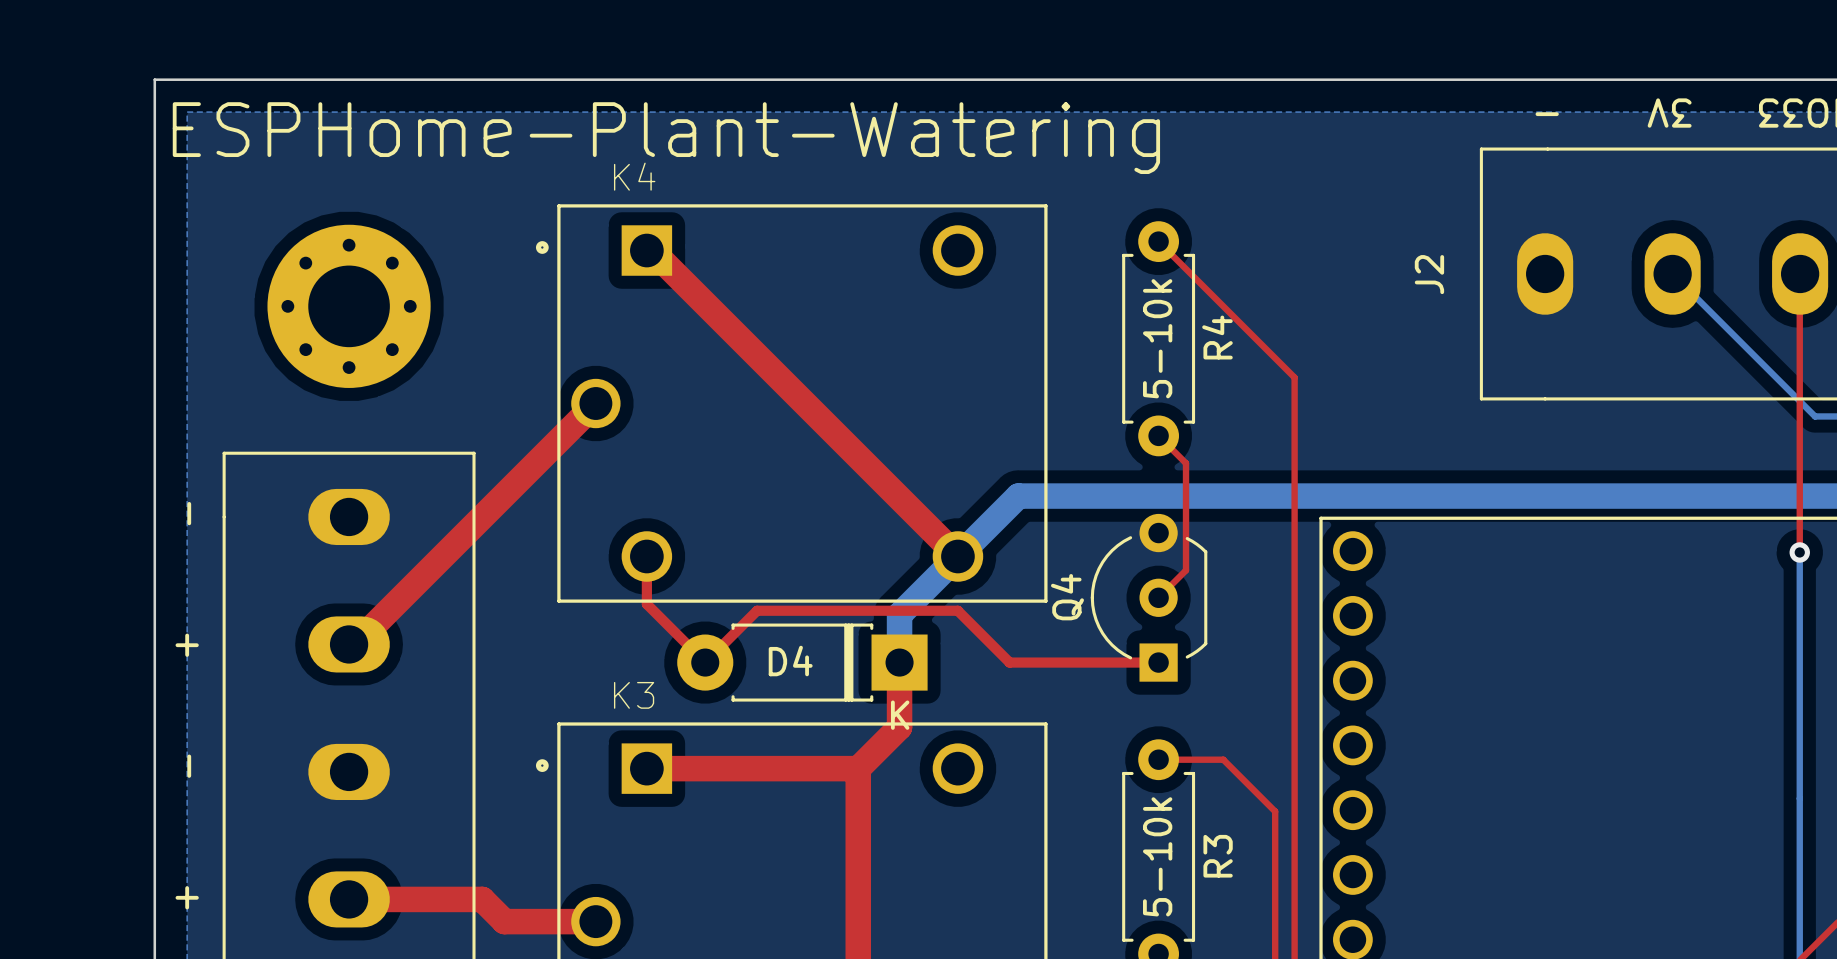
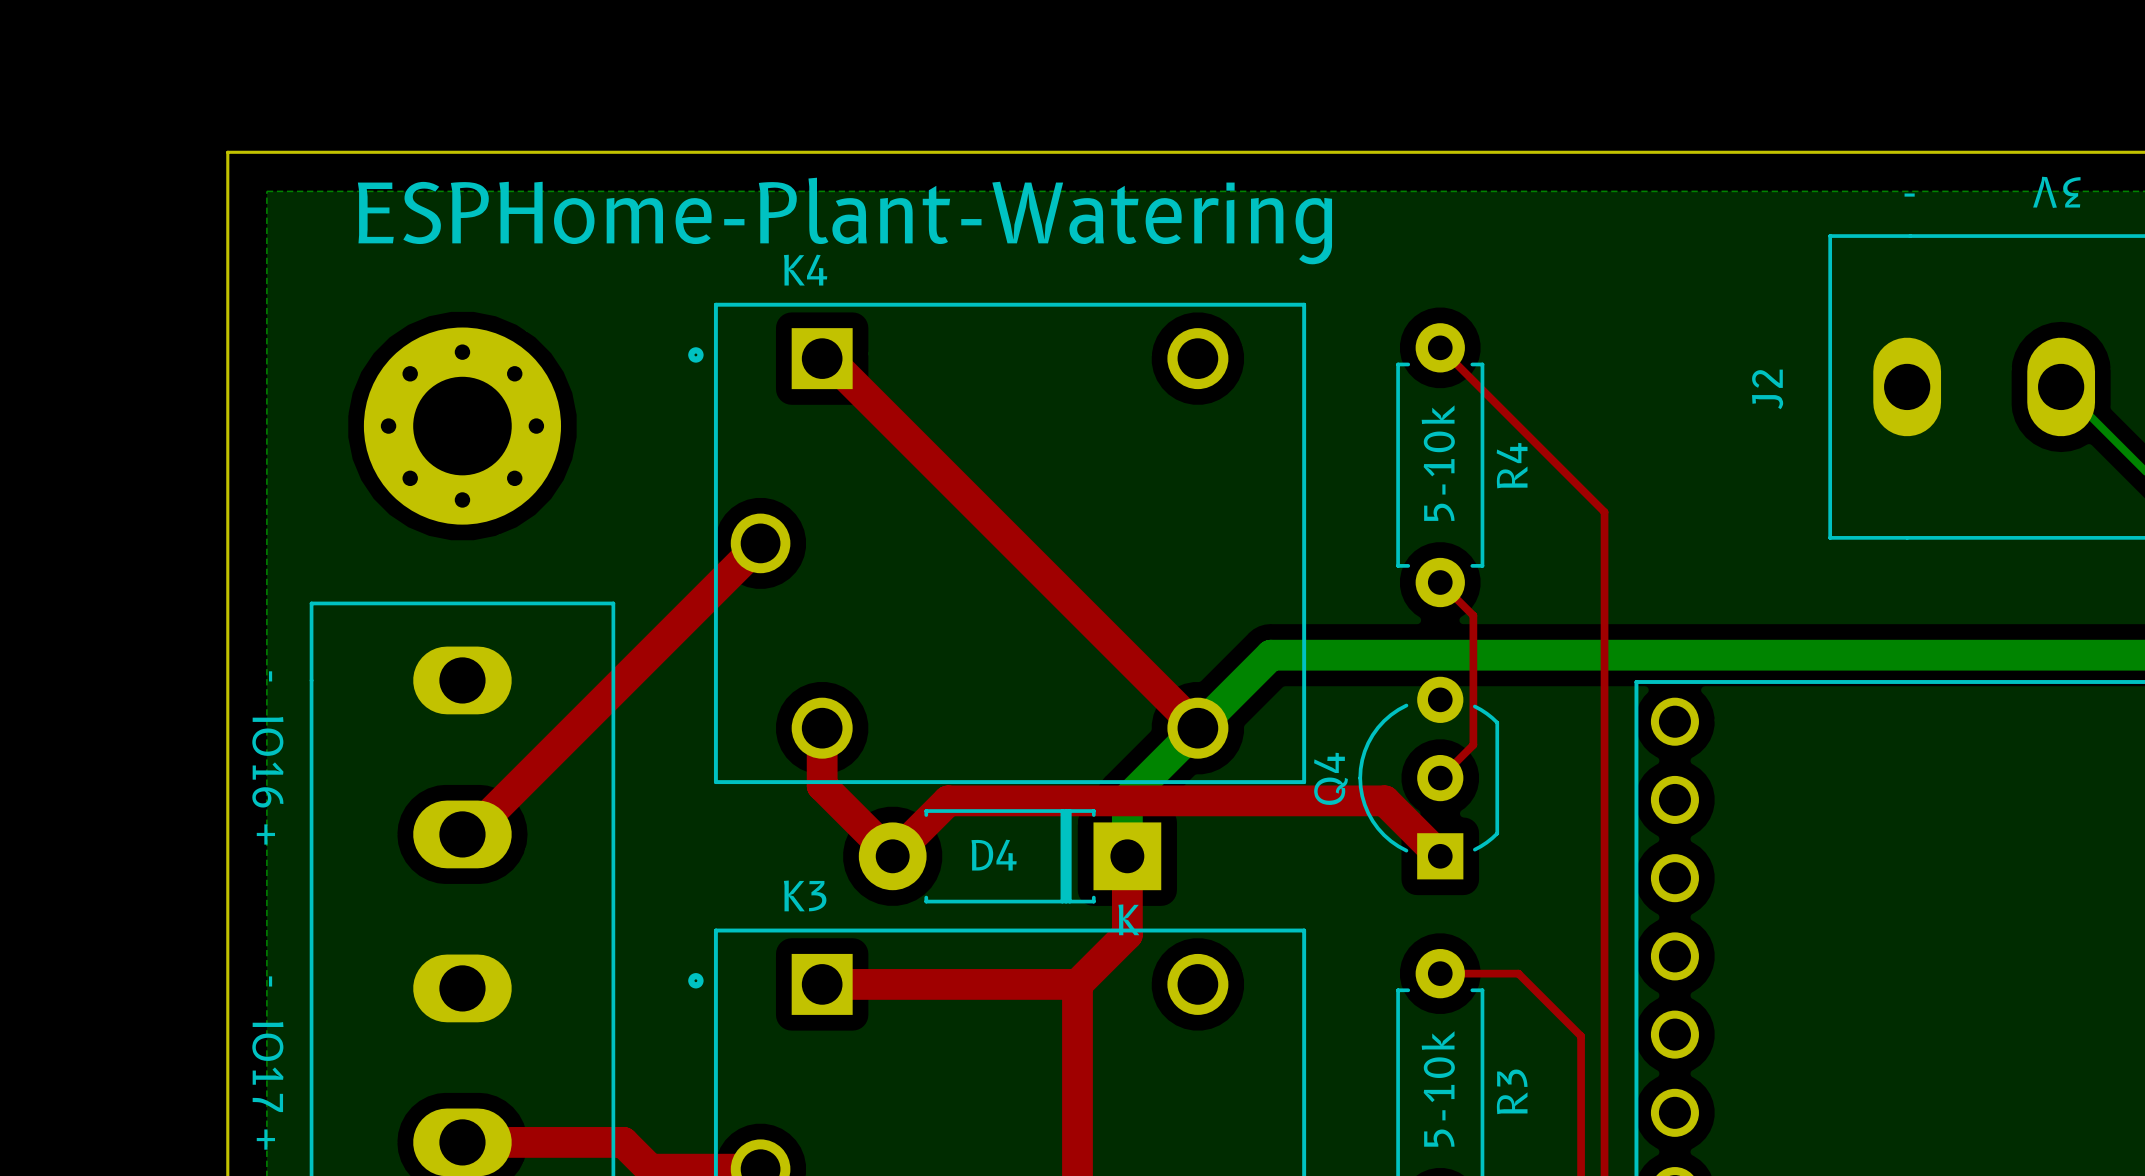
top track width: thin (646, 556) (646, 604) (705, 662) (751, 616) -> thick (822, 728) (822, 785) (892, 856) (948, 800)
text: none -> IO16 (267, 762)
top track: (751, 616) (757, 610) (957, 610) (1009, 662) (1158, 662) -> (948, 800) (1384, 800) (1440, 856)
text: none -> IO17 (267, 1067)

